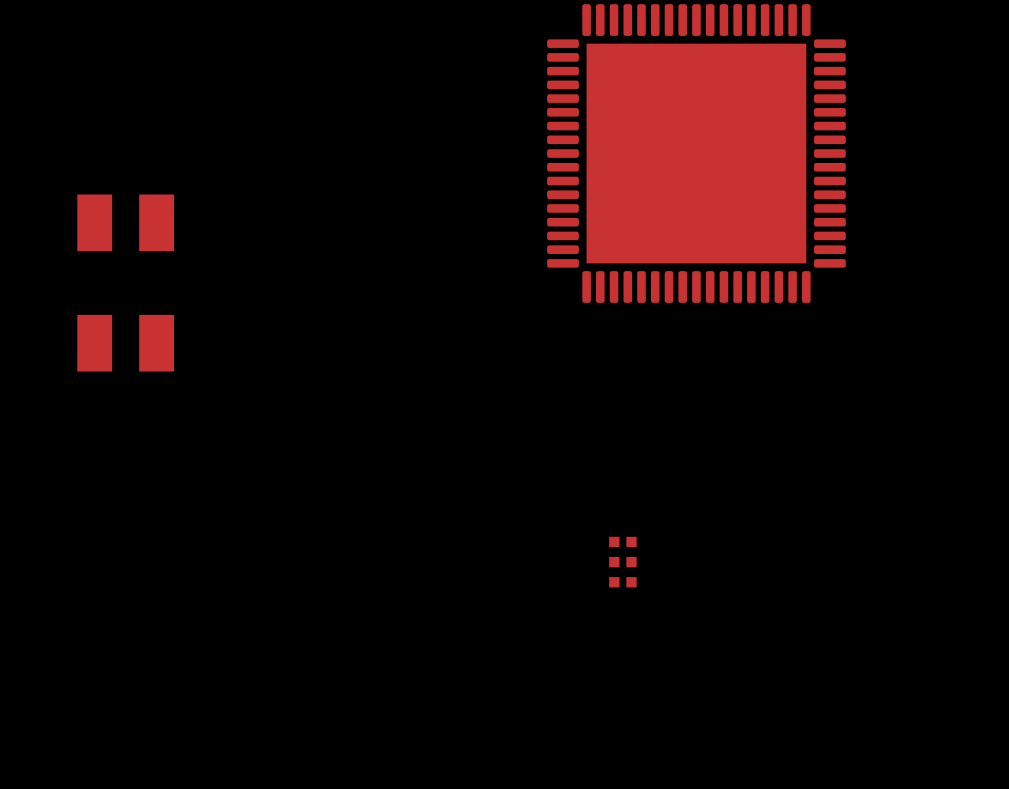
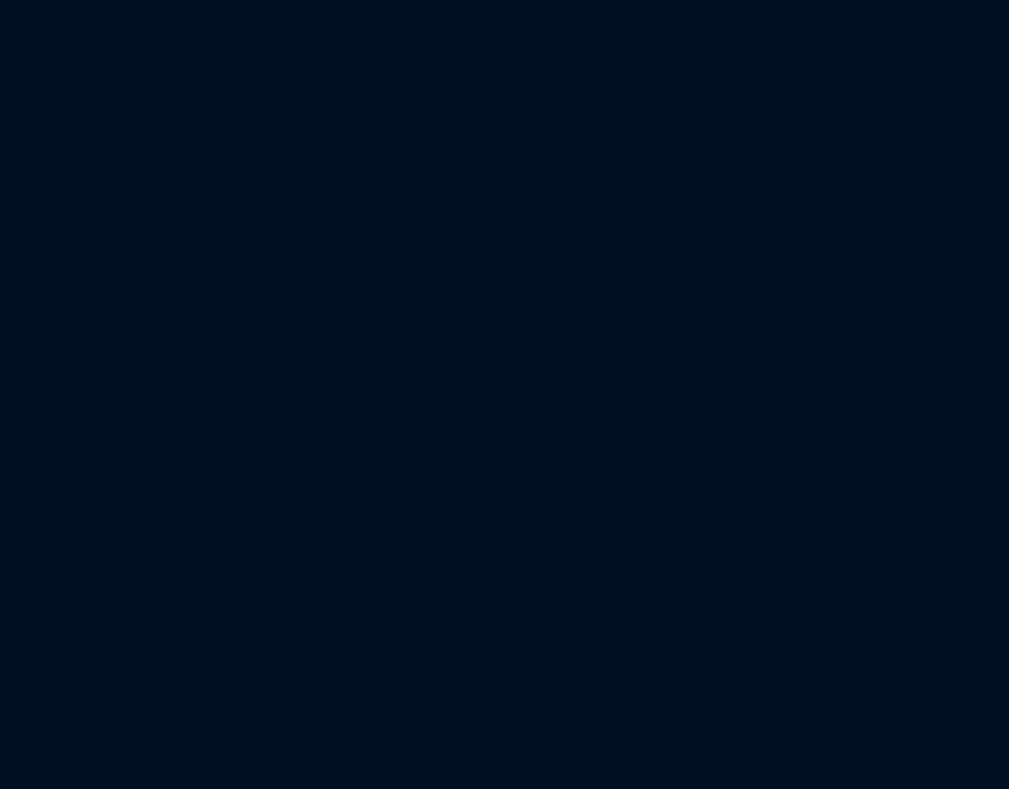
part: (696, 153) -> none
part: (125, 283) -> none
part: (622, 562) -> none

